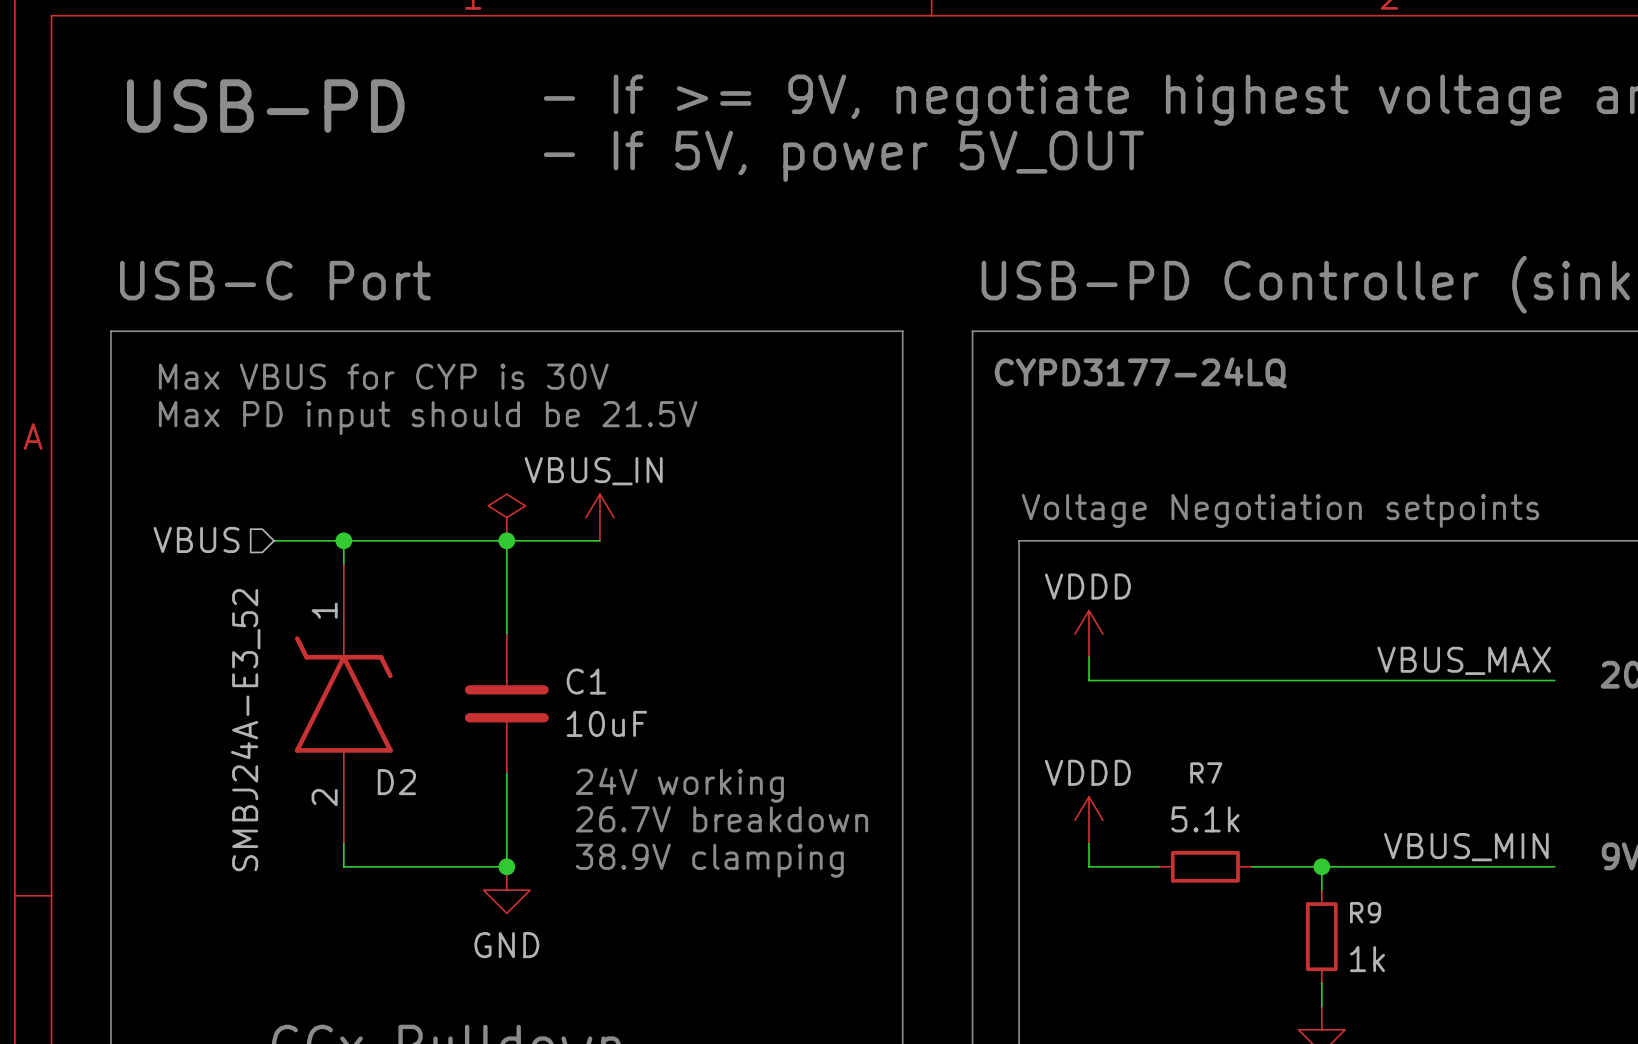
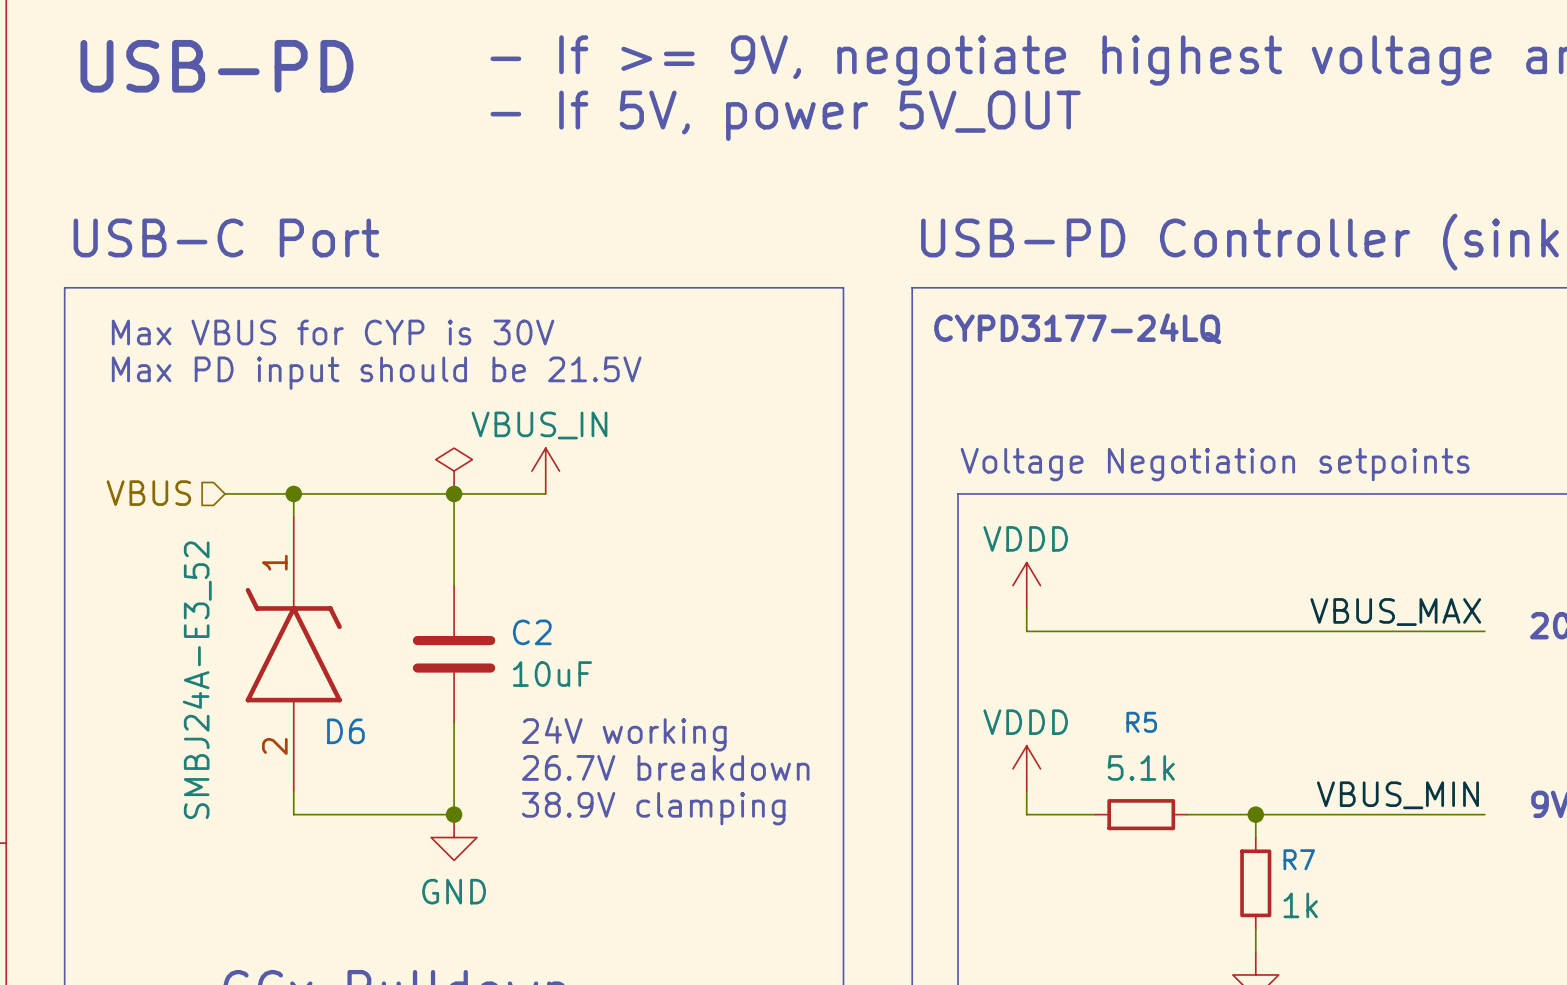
C1 name: C1 (586, 681) -> C2 (532, 632)
R7 name: R7 (1206, 772) -> R5 (1141, 722)
D2 name: D2 (396, 782) -> D6 (345, 731)
R9 name: R9 (1365, 912) -> R7 (1299, 859)

